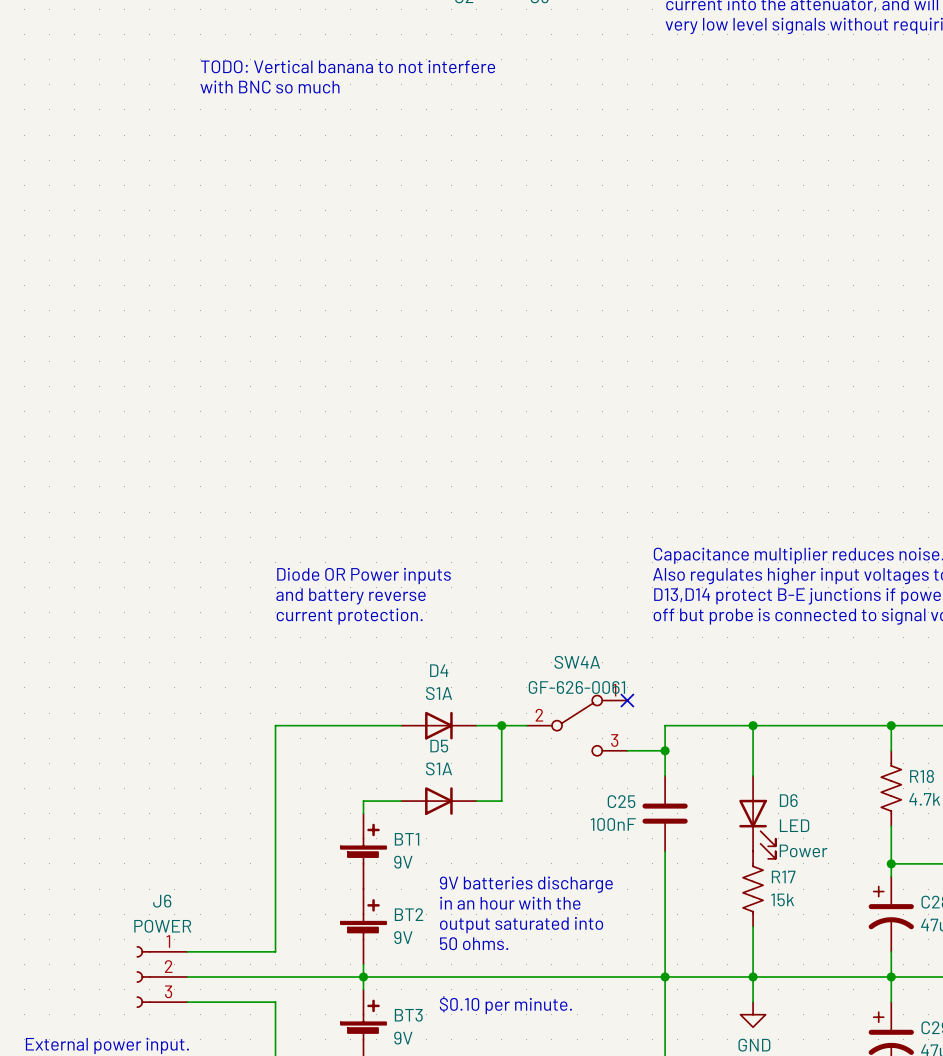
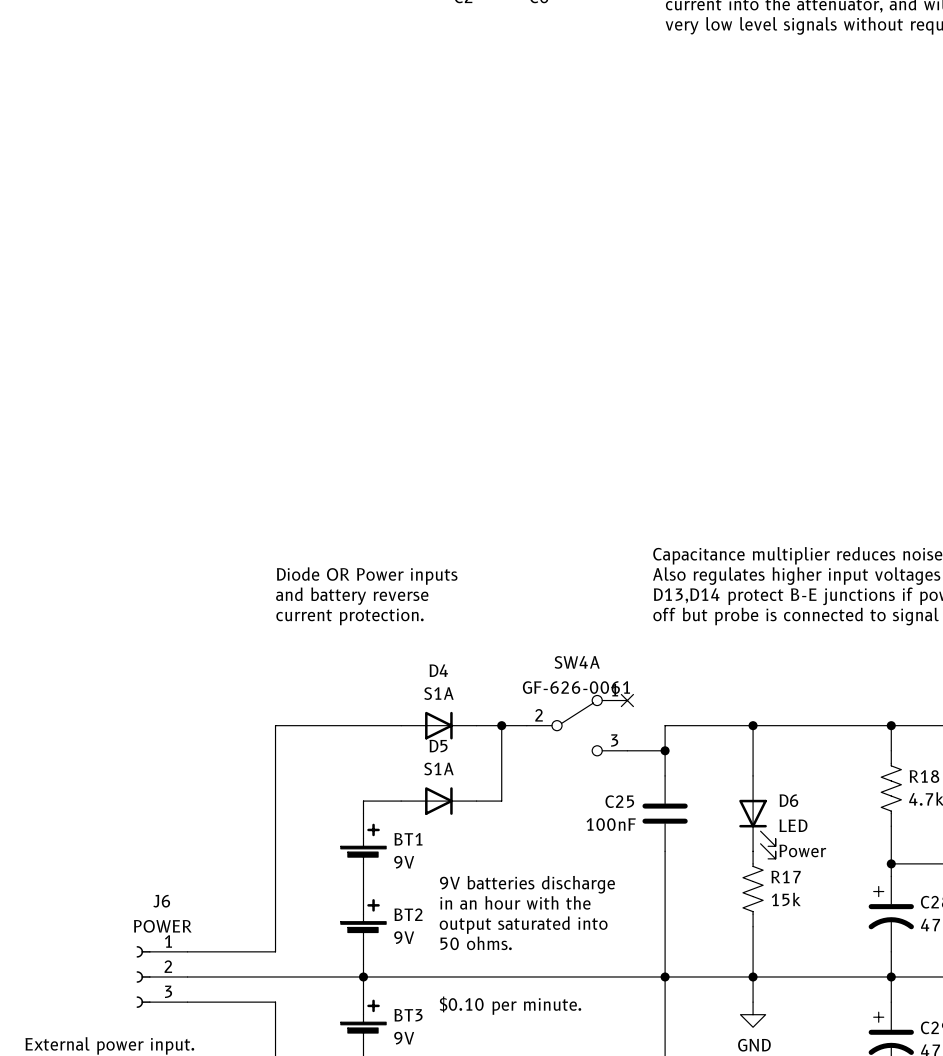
text: TODO: Vertical banana to not interfere (347, 66) -> none
text: with BNC so much (270, 87) -> none

